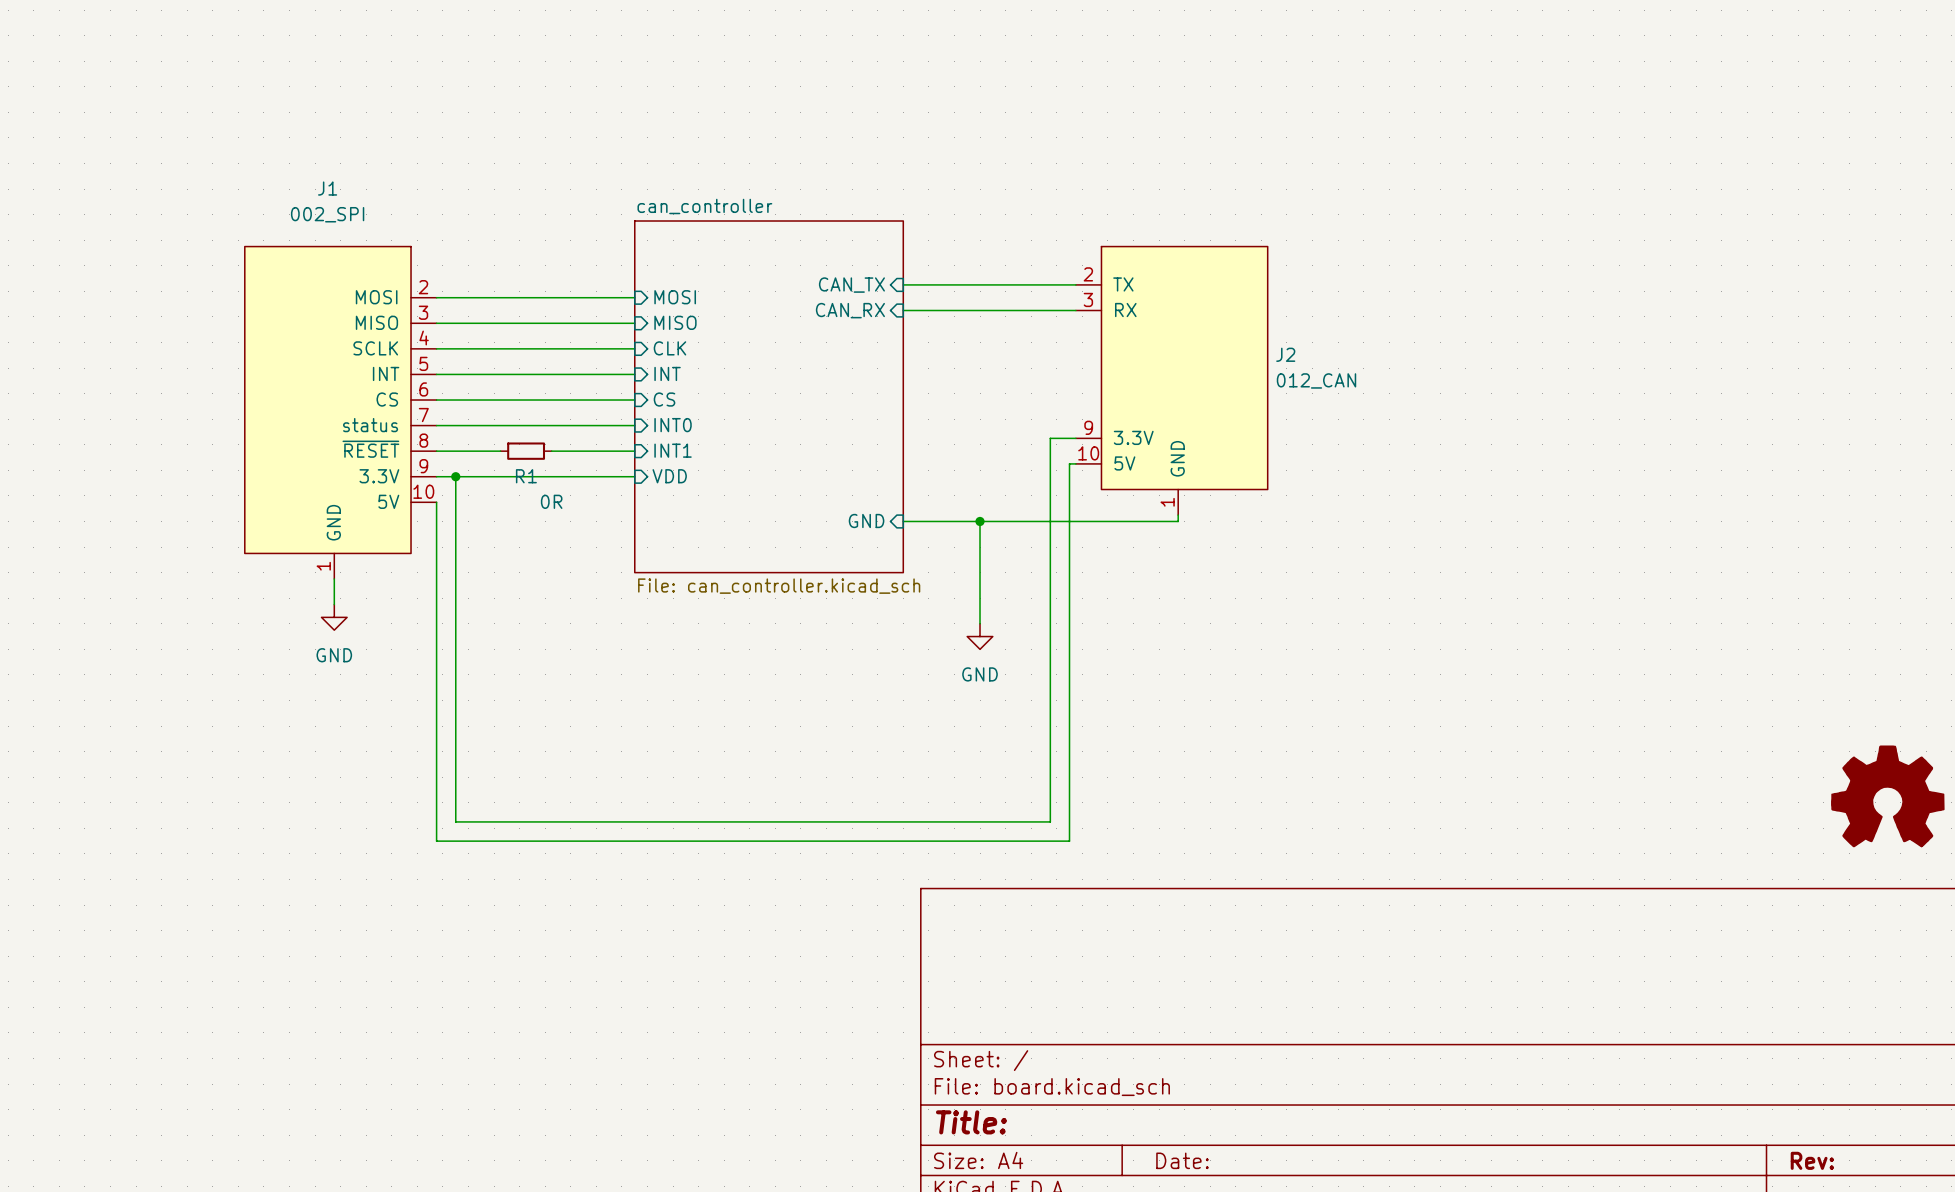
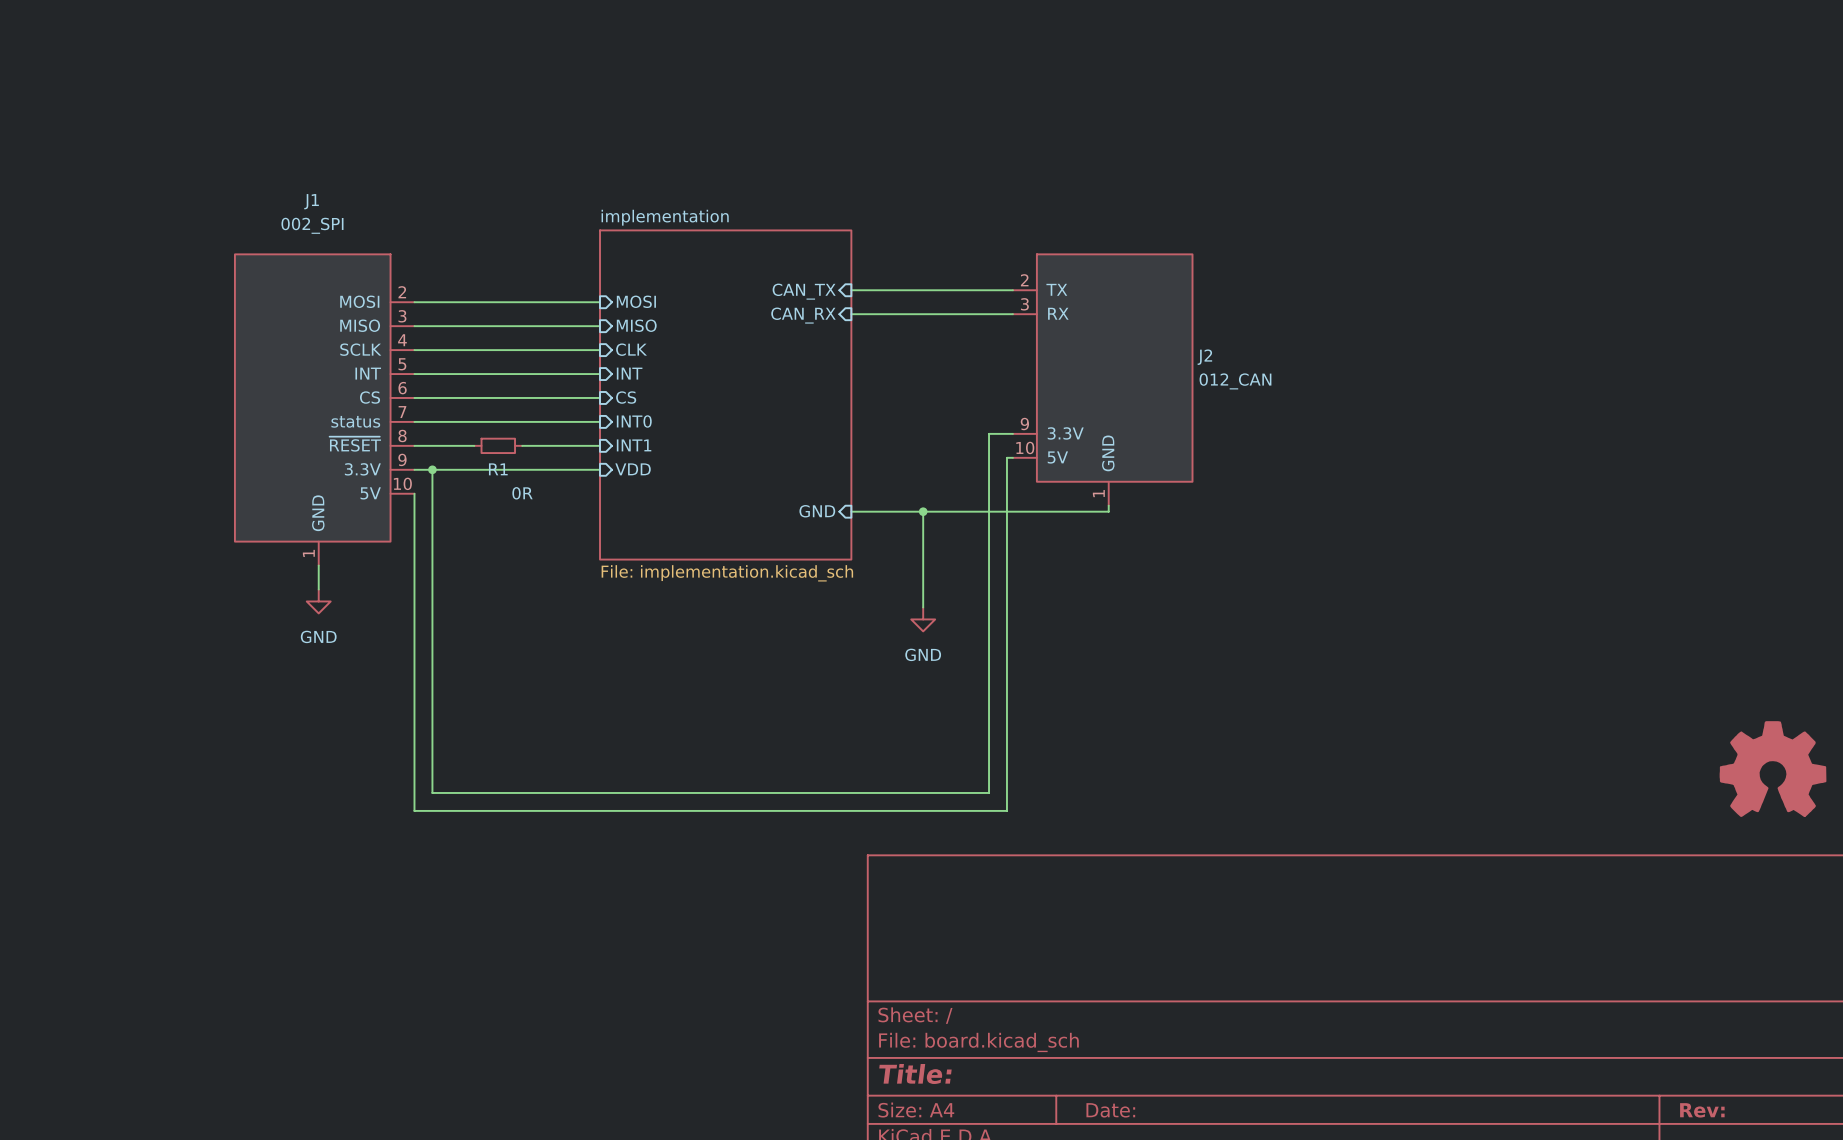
sheet can_controller name: can_controller (704, 206) -> implementation (665, 217)
sheet can_controller value: File: can_controller.kicad_sch (779, 586) -> File: implementation.kicad_sch (727, 573)

